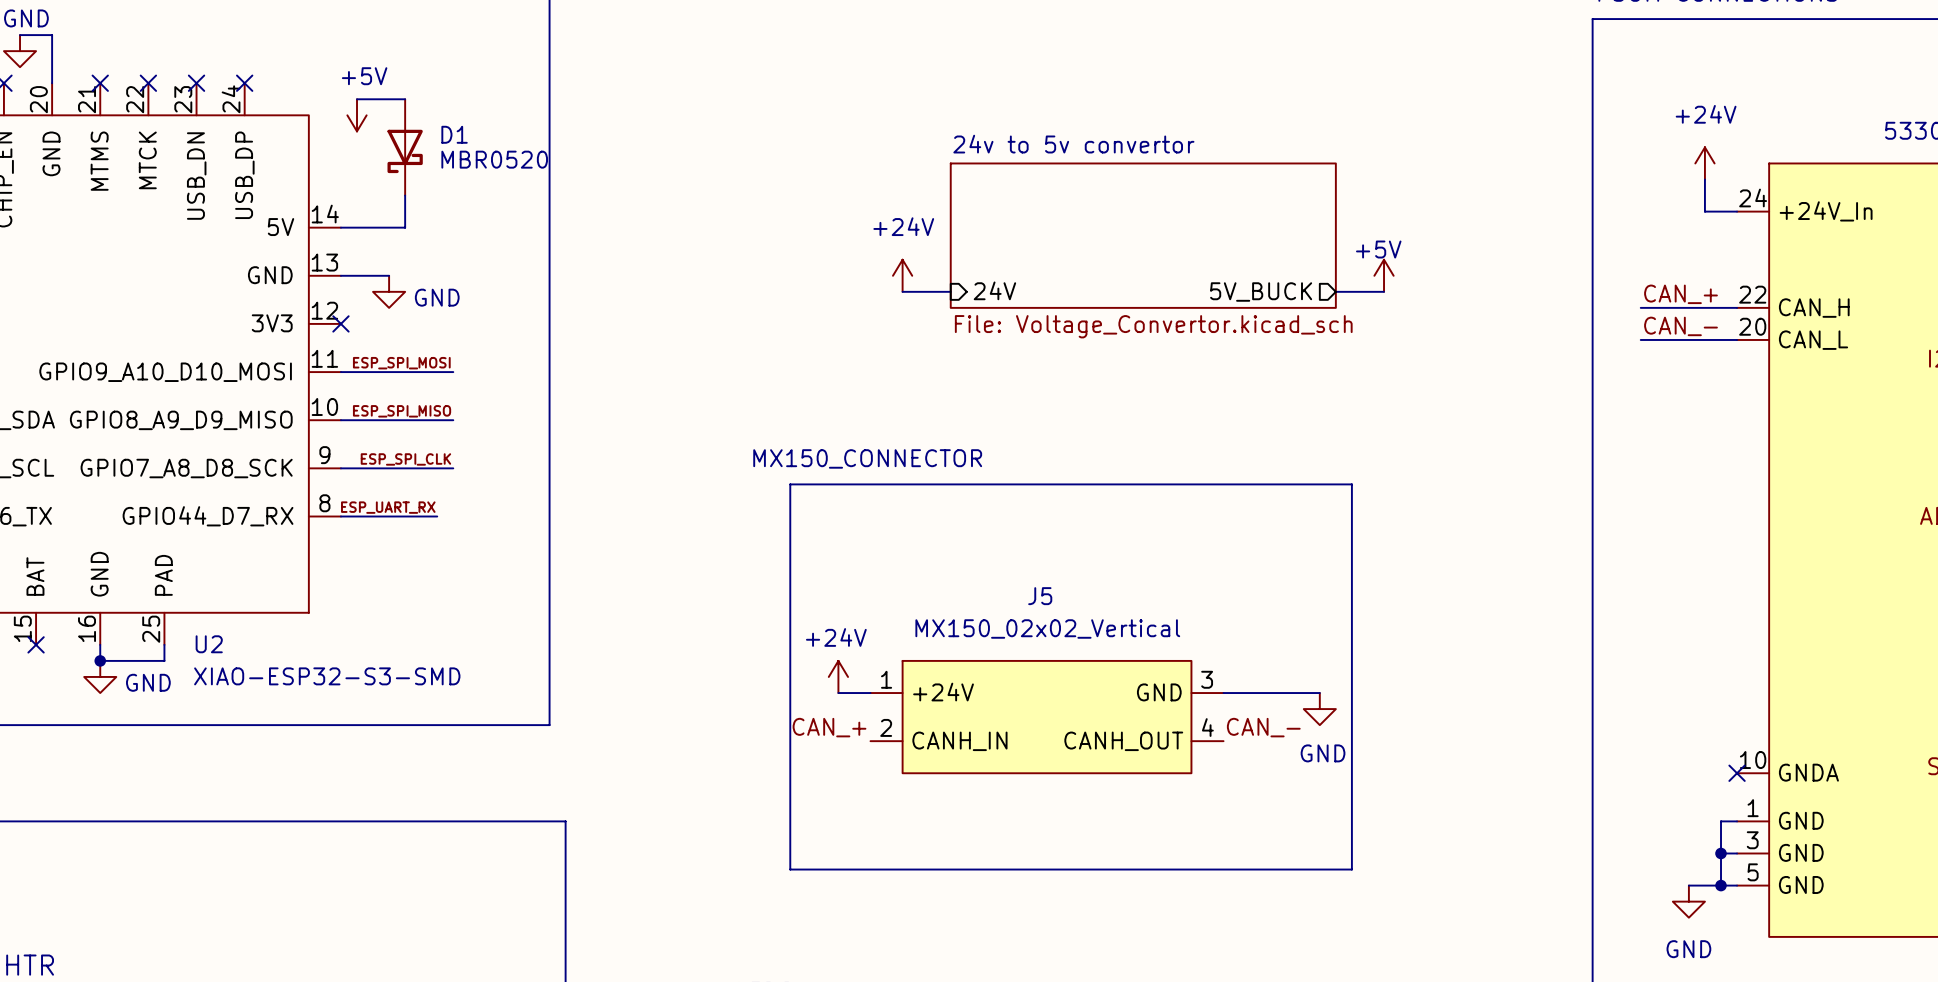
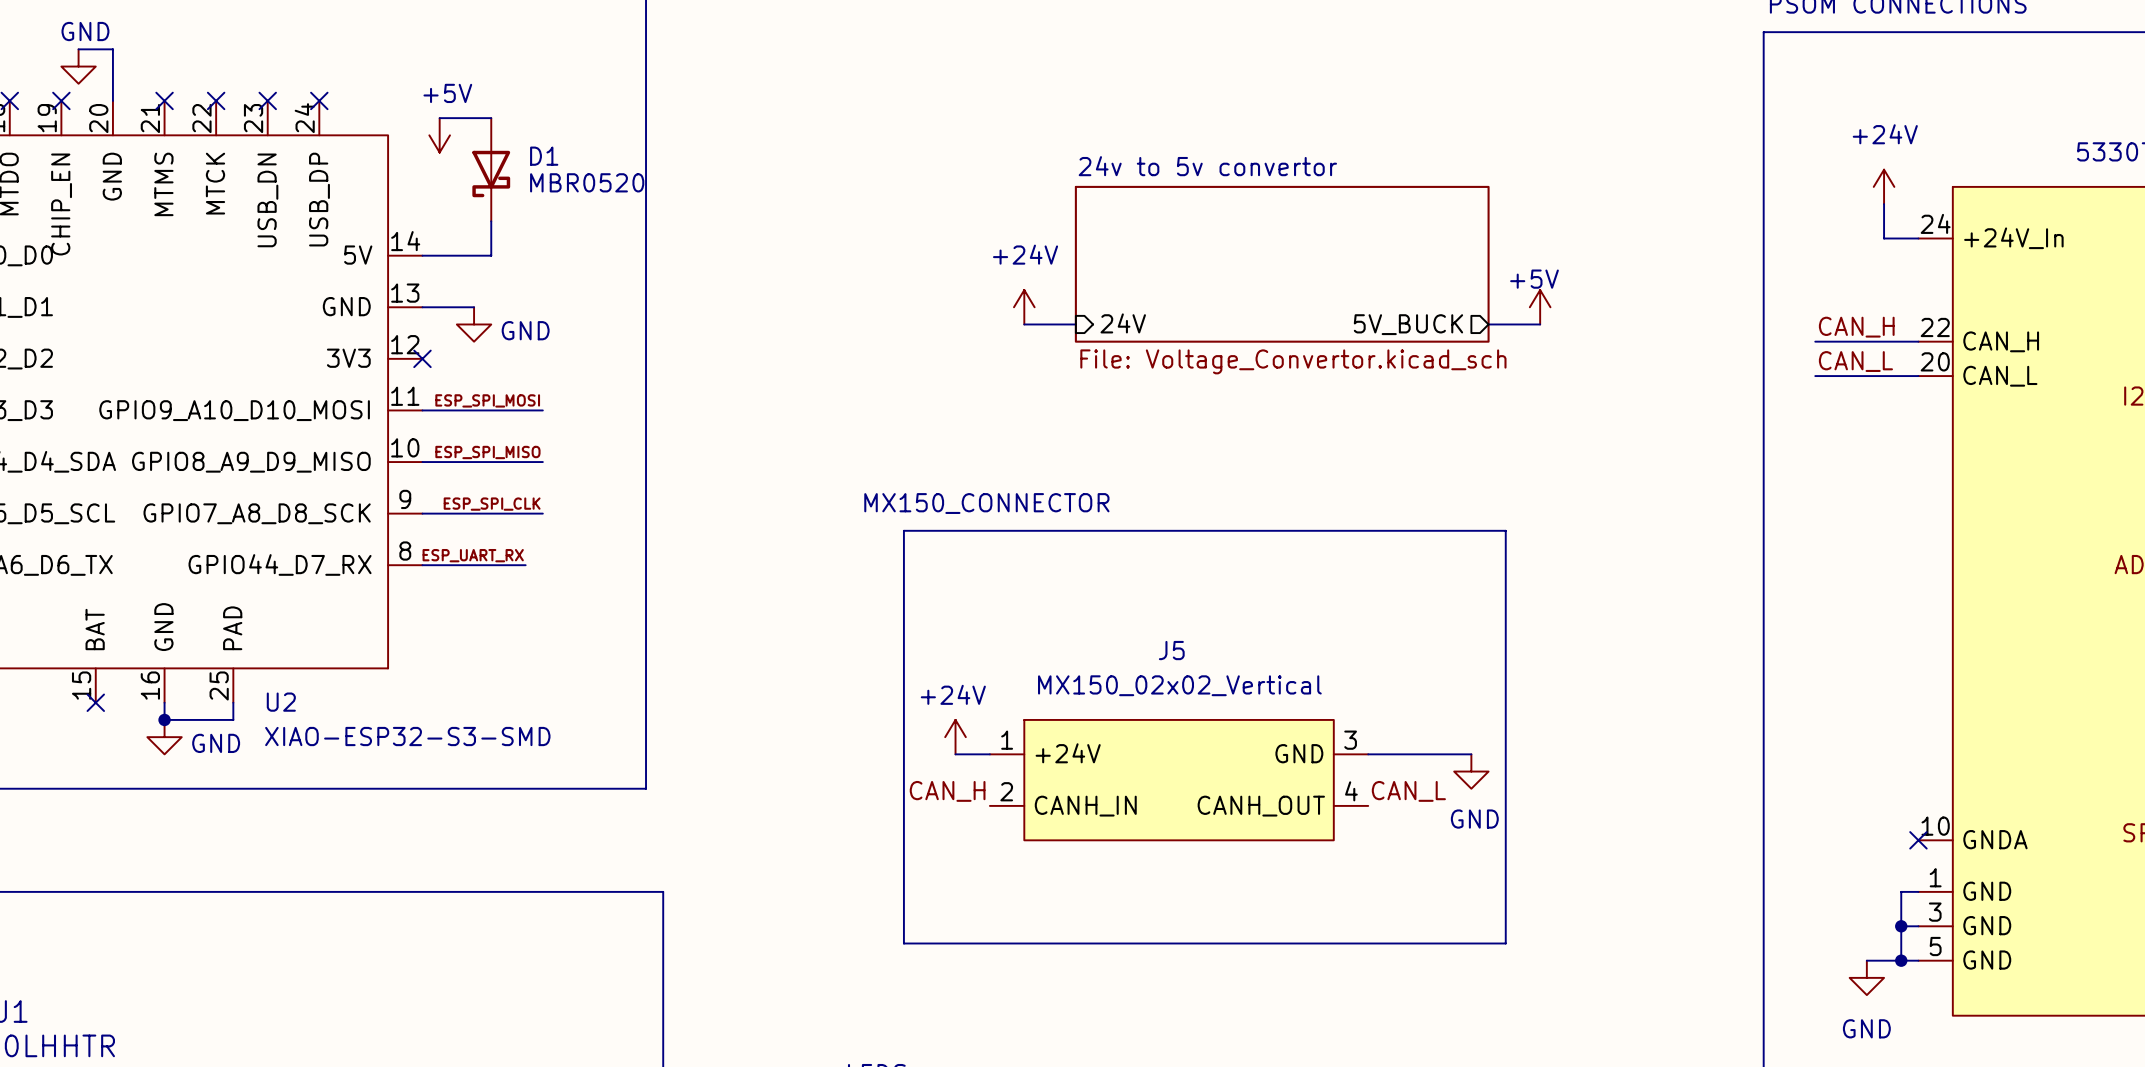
label: CAN_+ (1681, 294) -> CAN_H (1856, 327)
label: CAN_- (1681, 326) -> CAN_L (1855, 361)
label: CAN_+ (829, 727) -> CAN_H (947, 791)
label: CAN_- (1263, 727) -> CAN_L (1408, 791)

